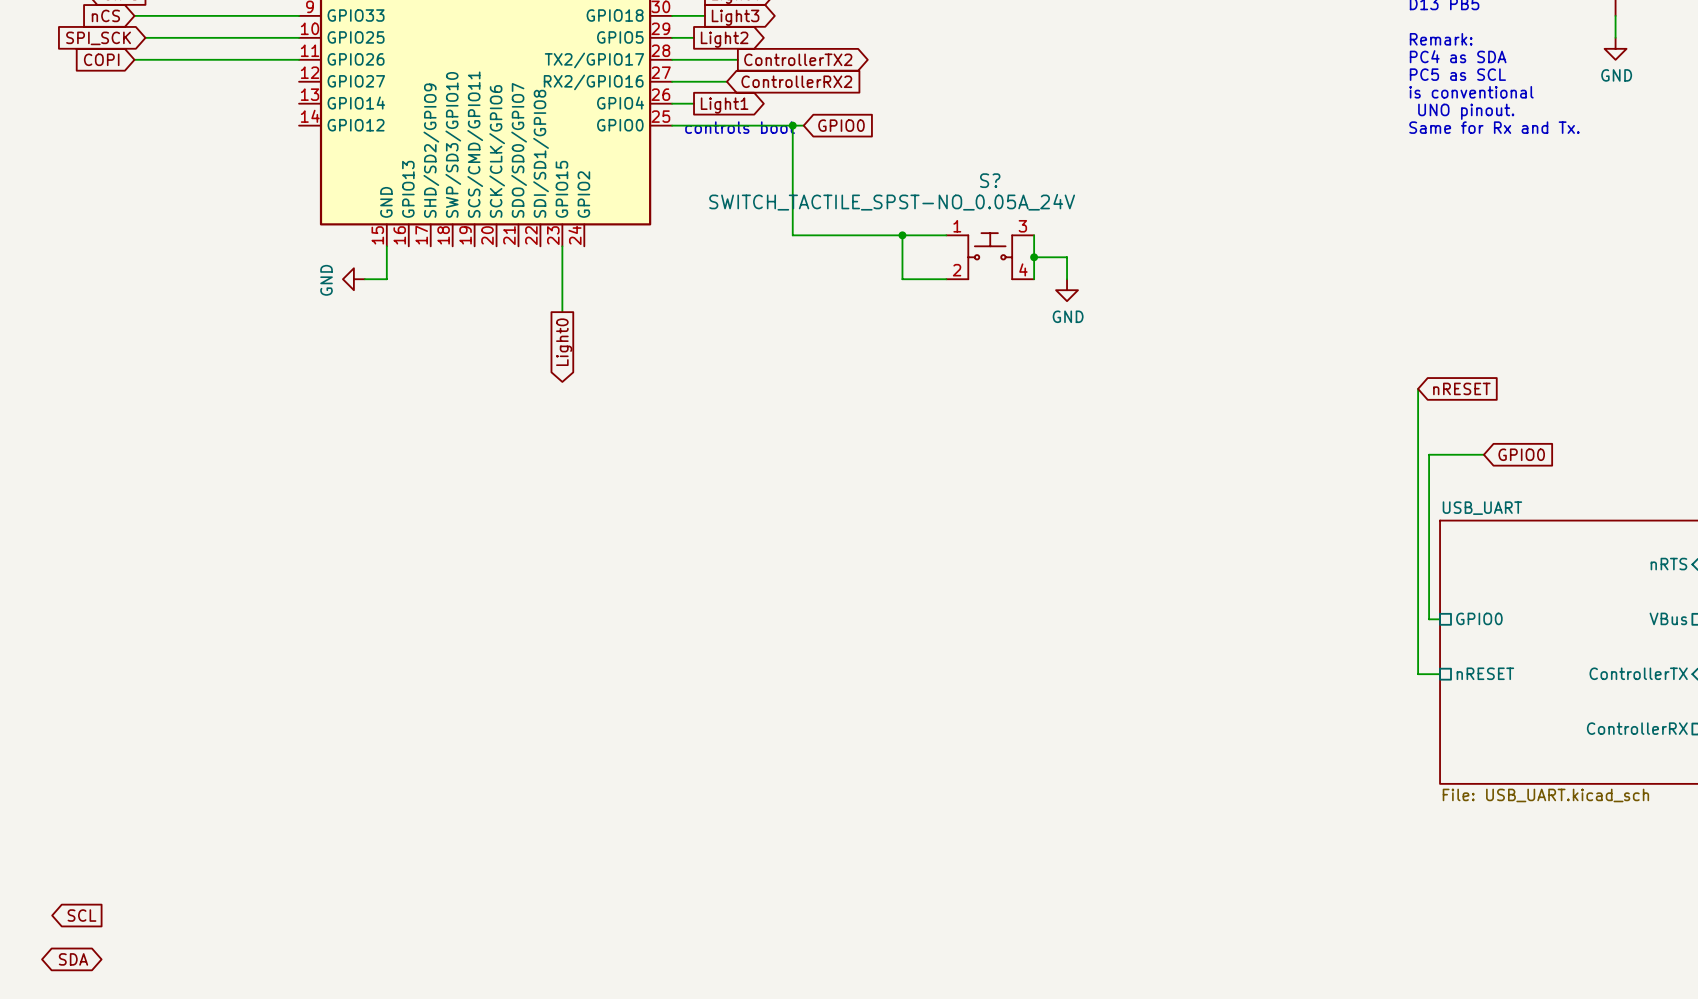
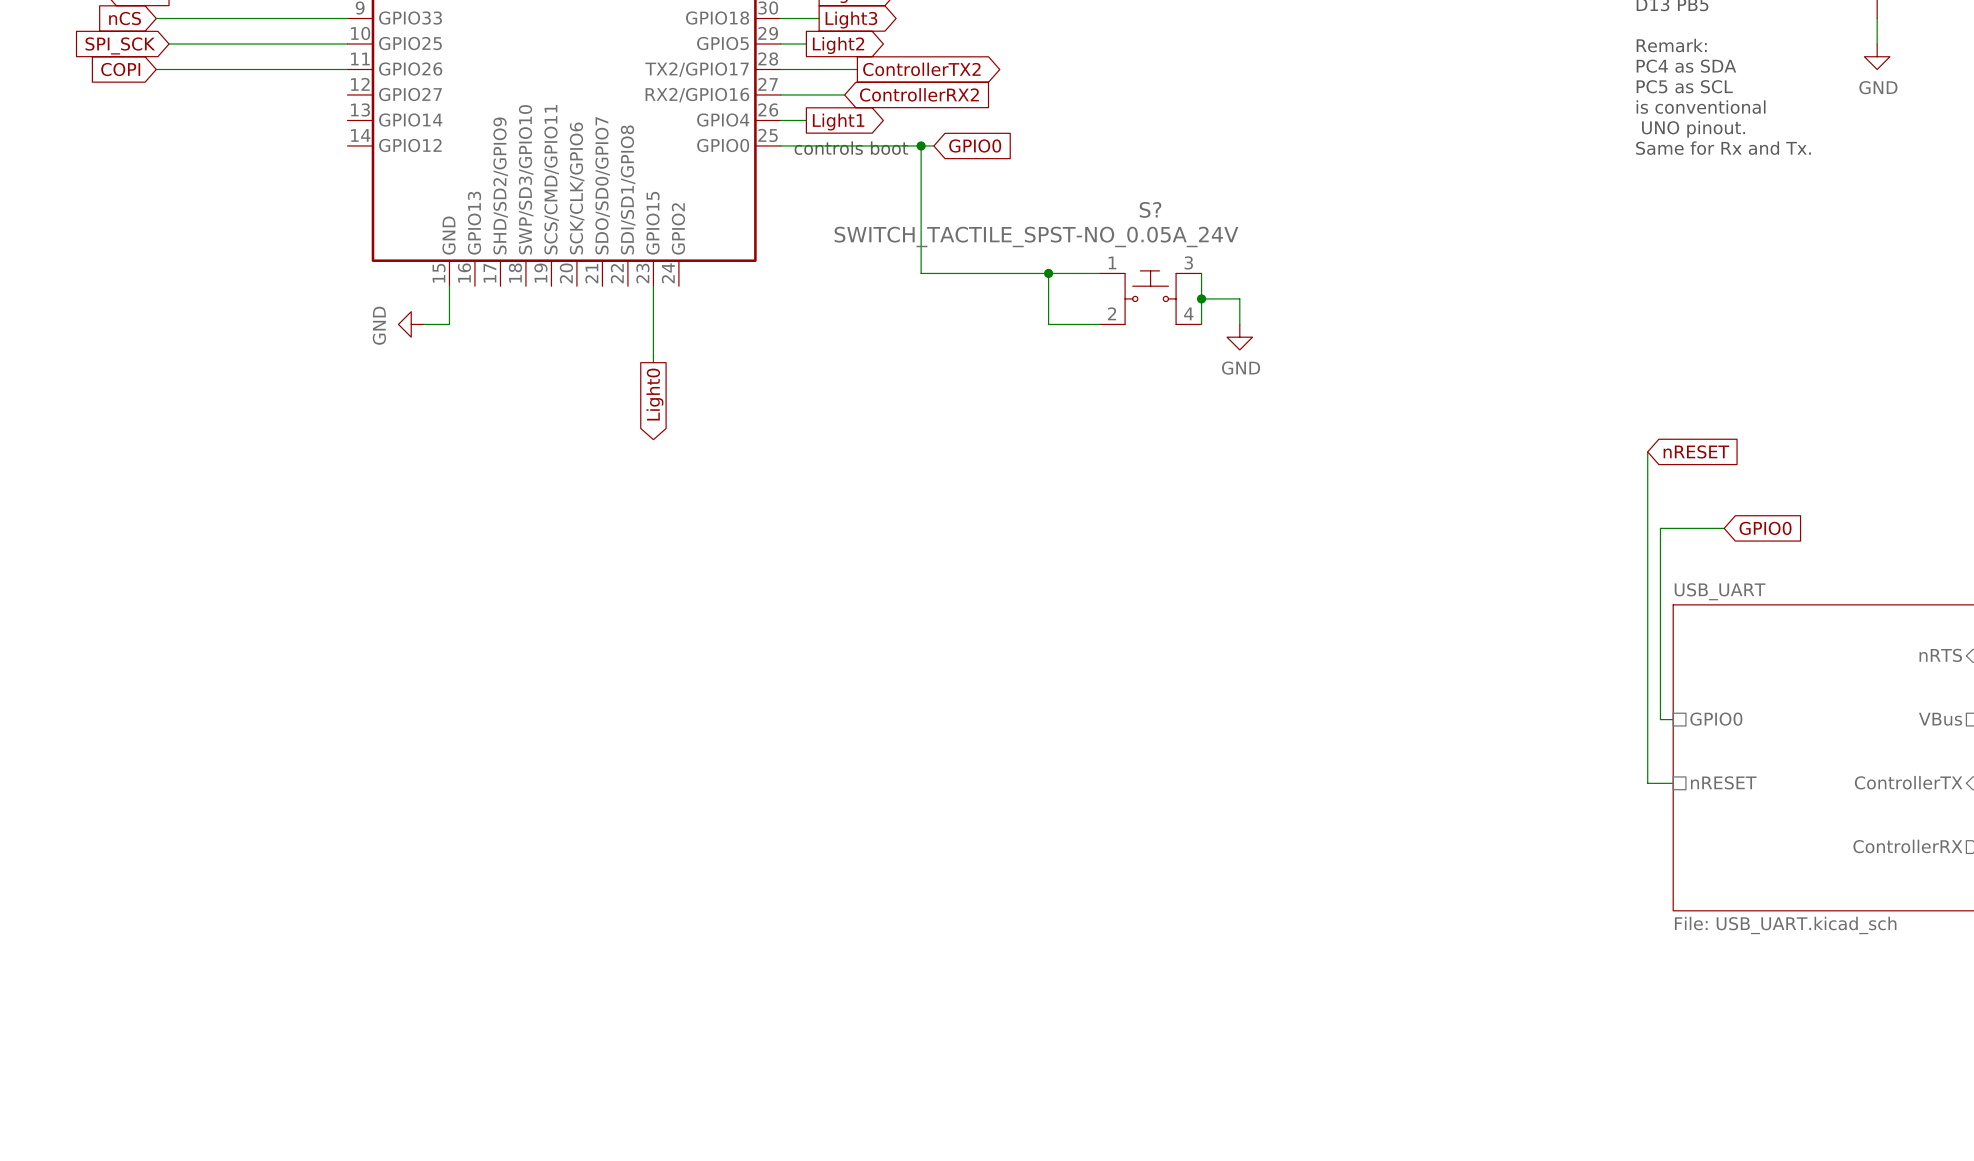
global label: SCL (81, 915) -> none
global label: SDA (73, 959) -> none

